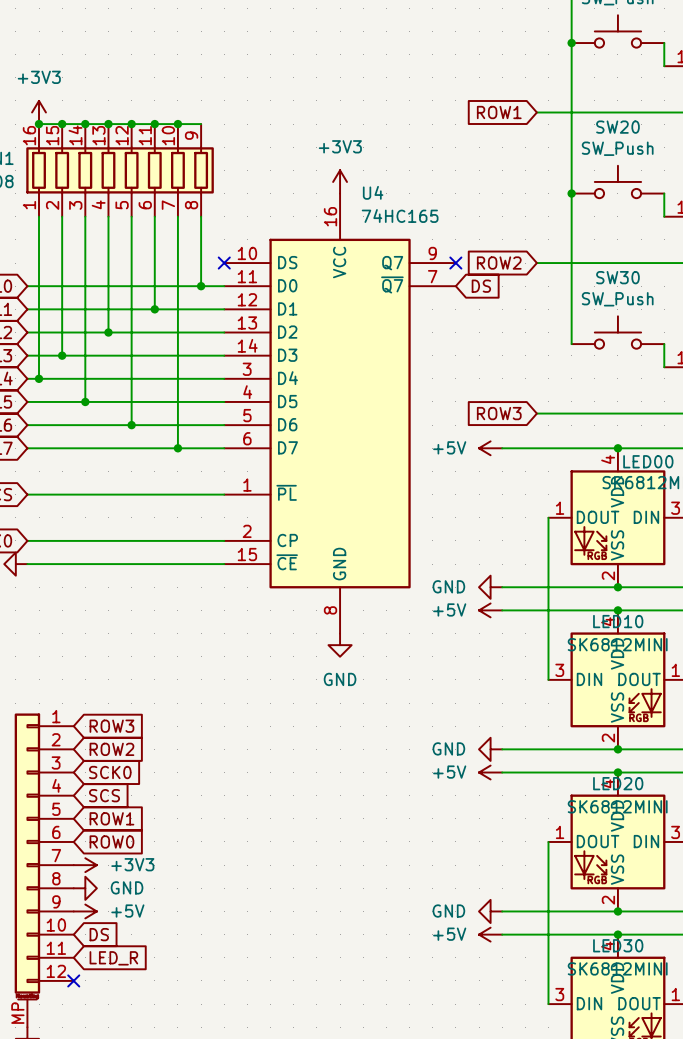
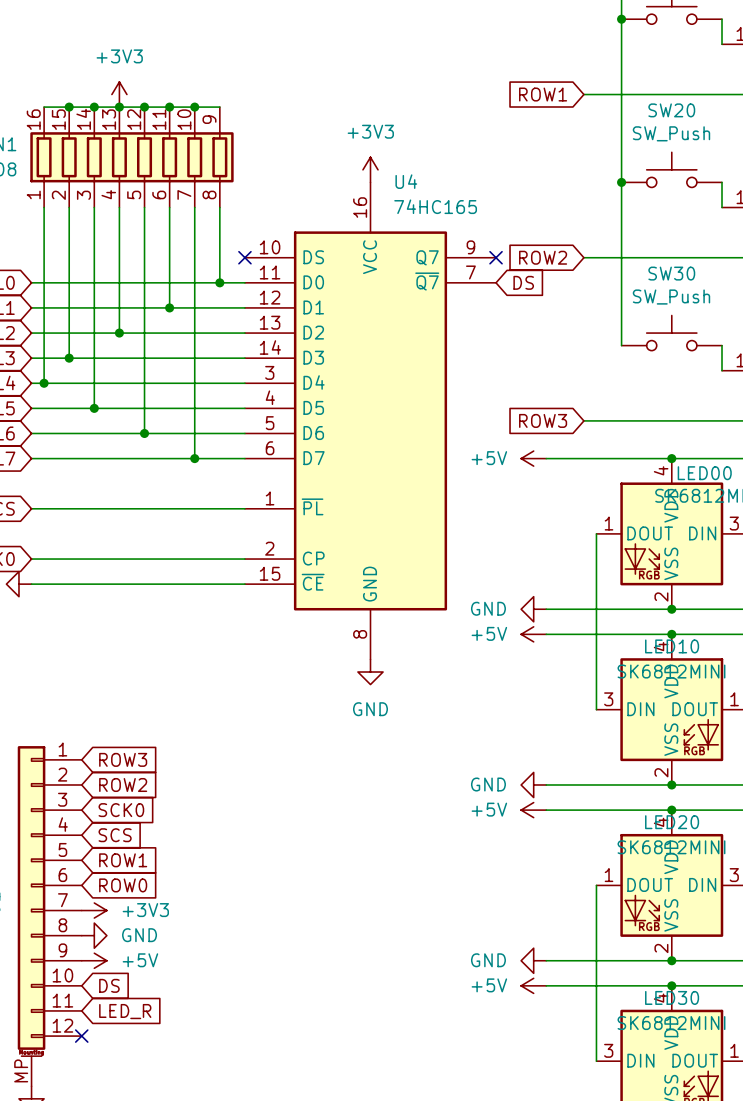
power symbol position: +3V3 (39, 112) -> +3V3 (119, 94)
junction: (39, 124) -> none

